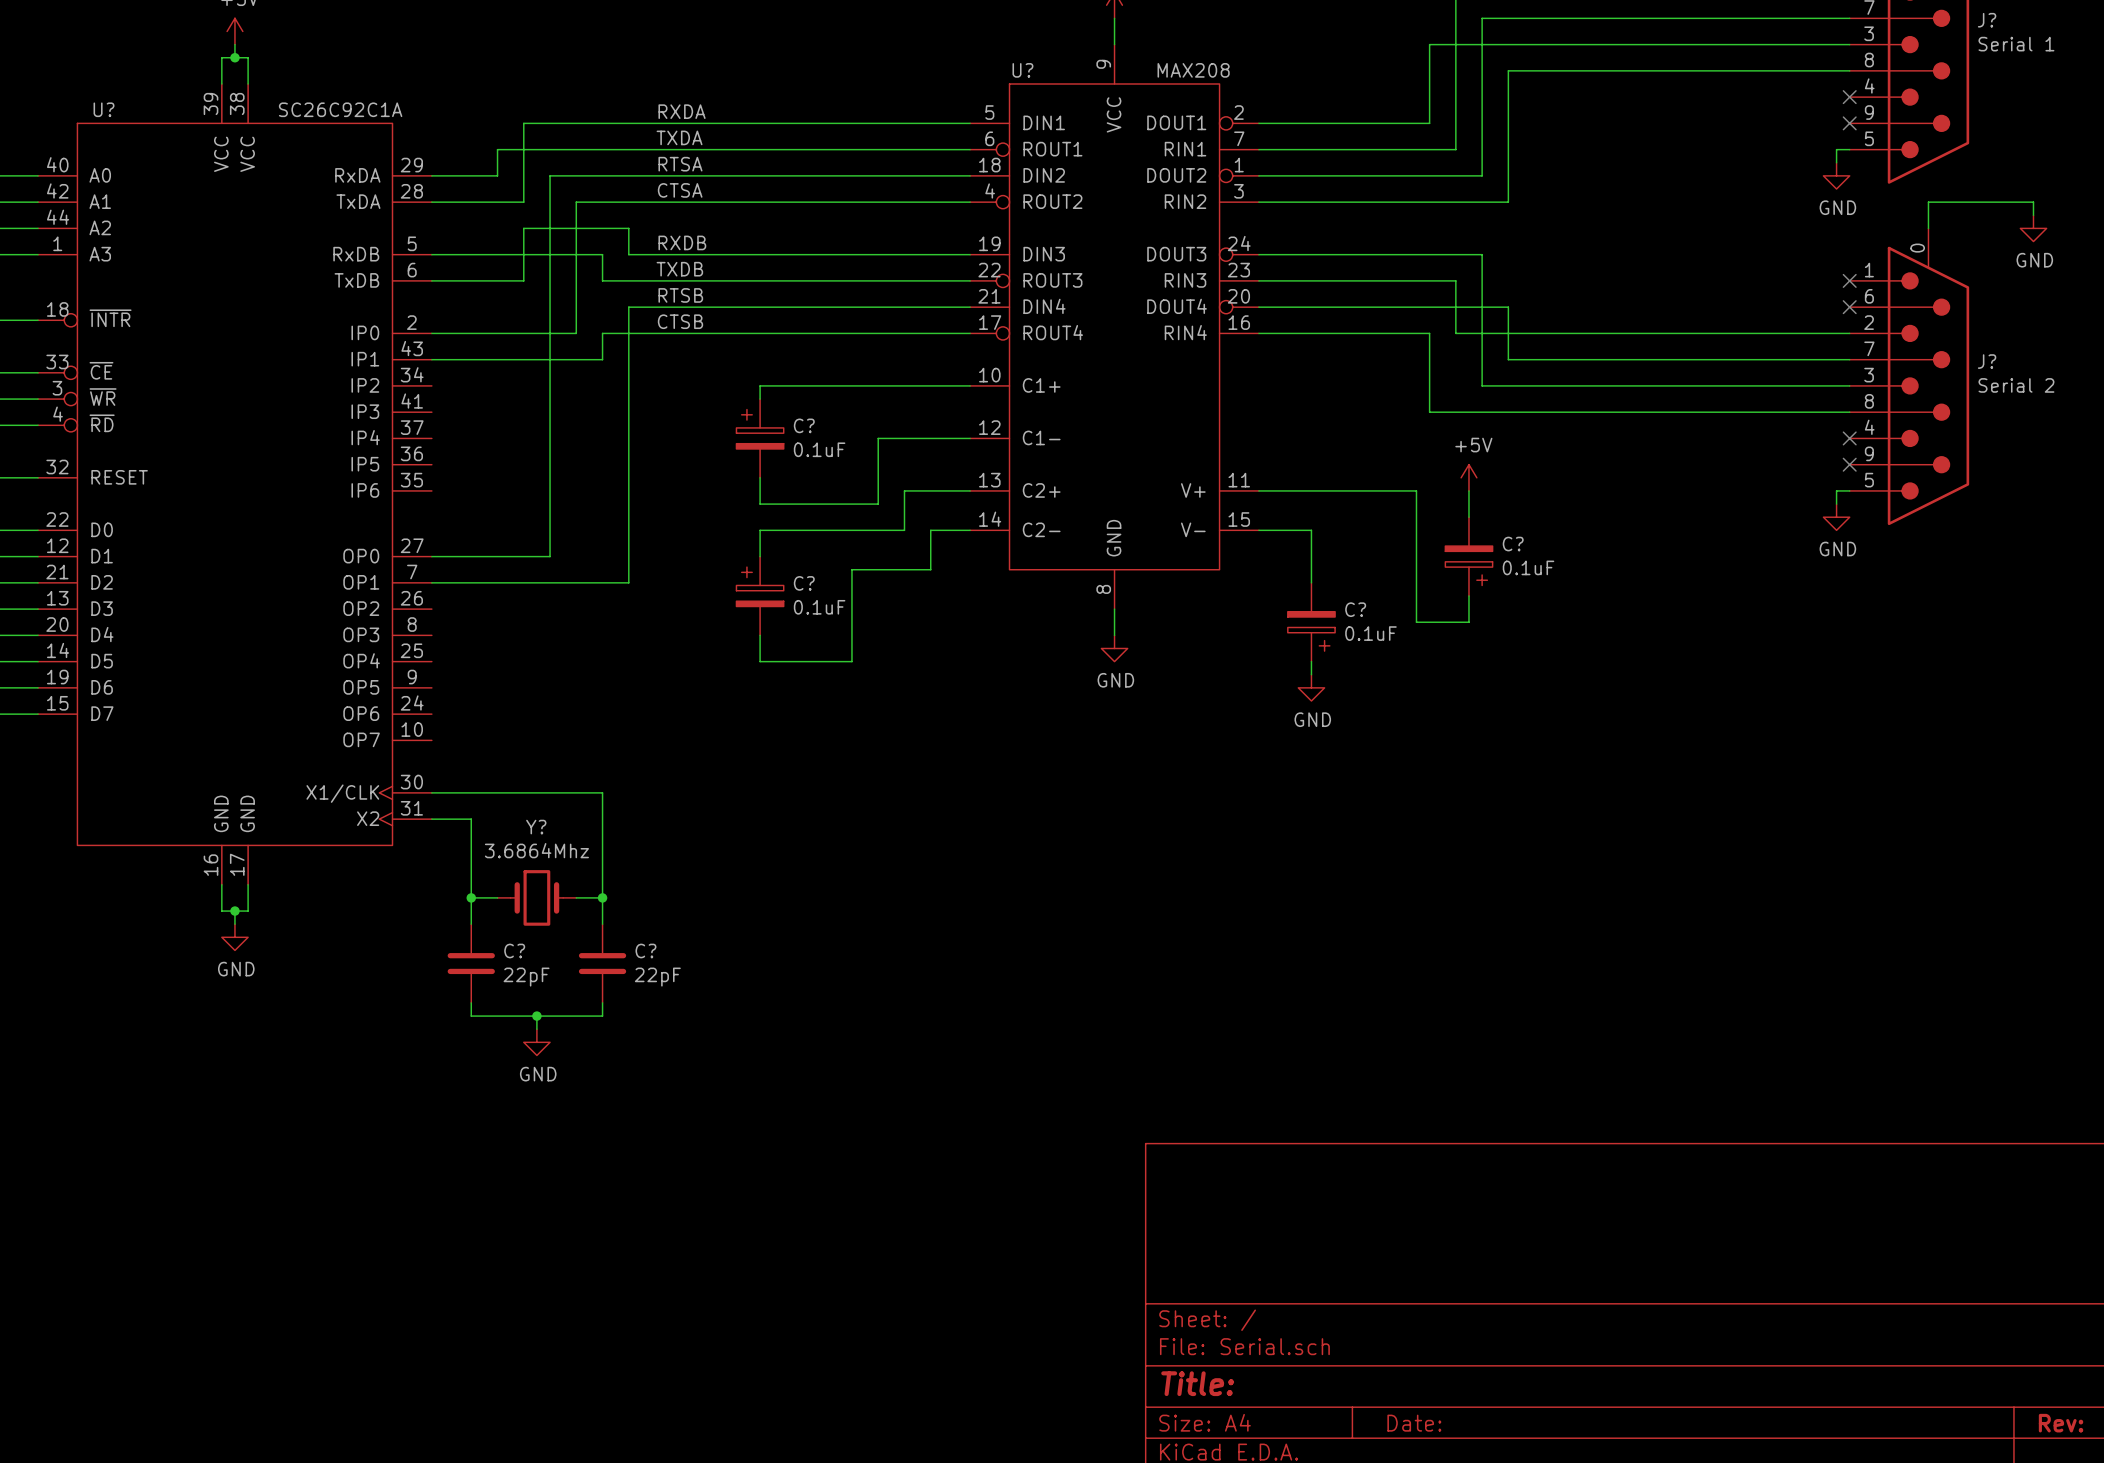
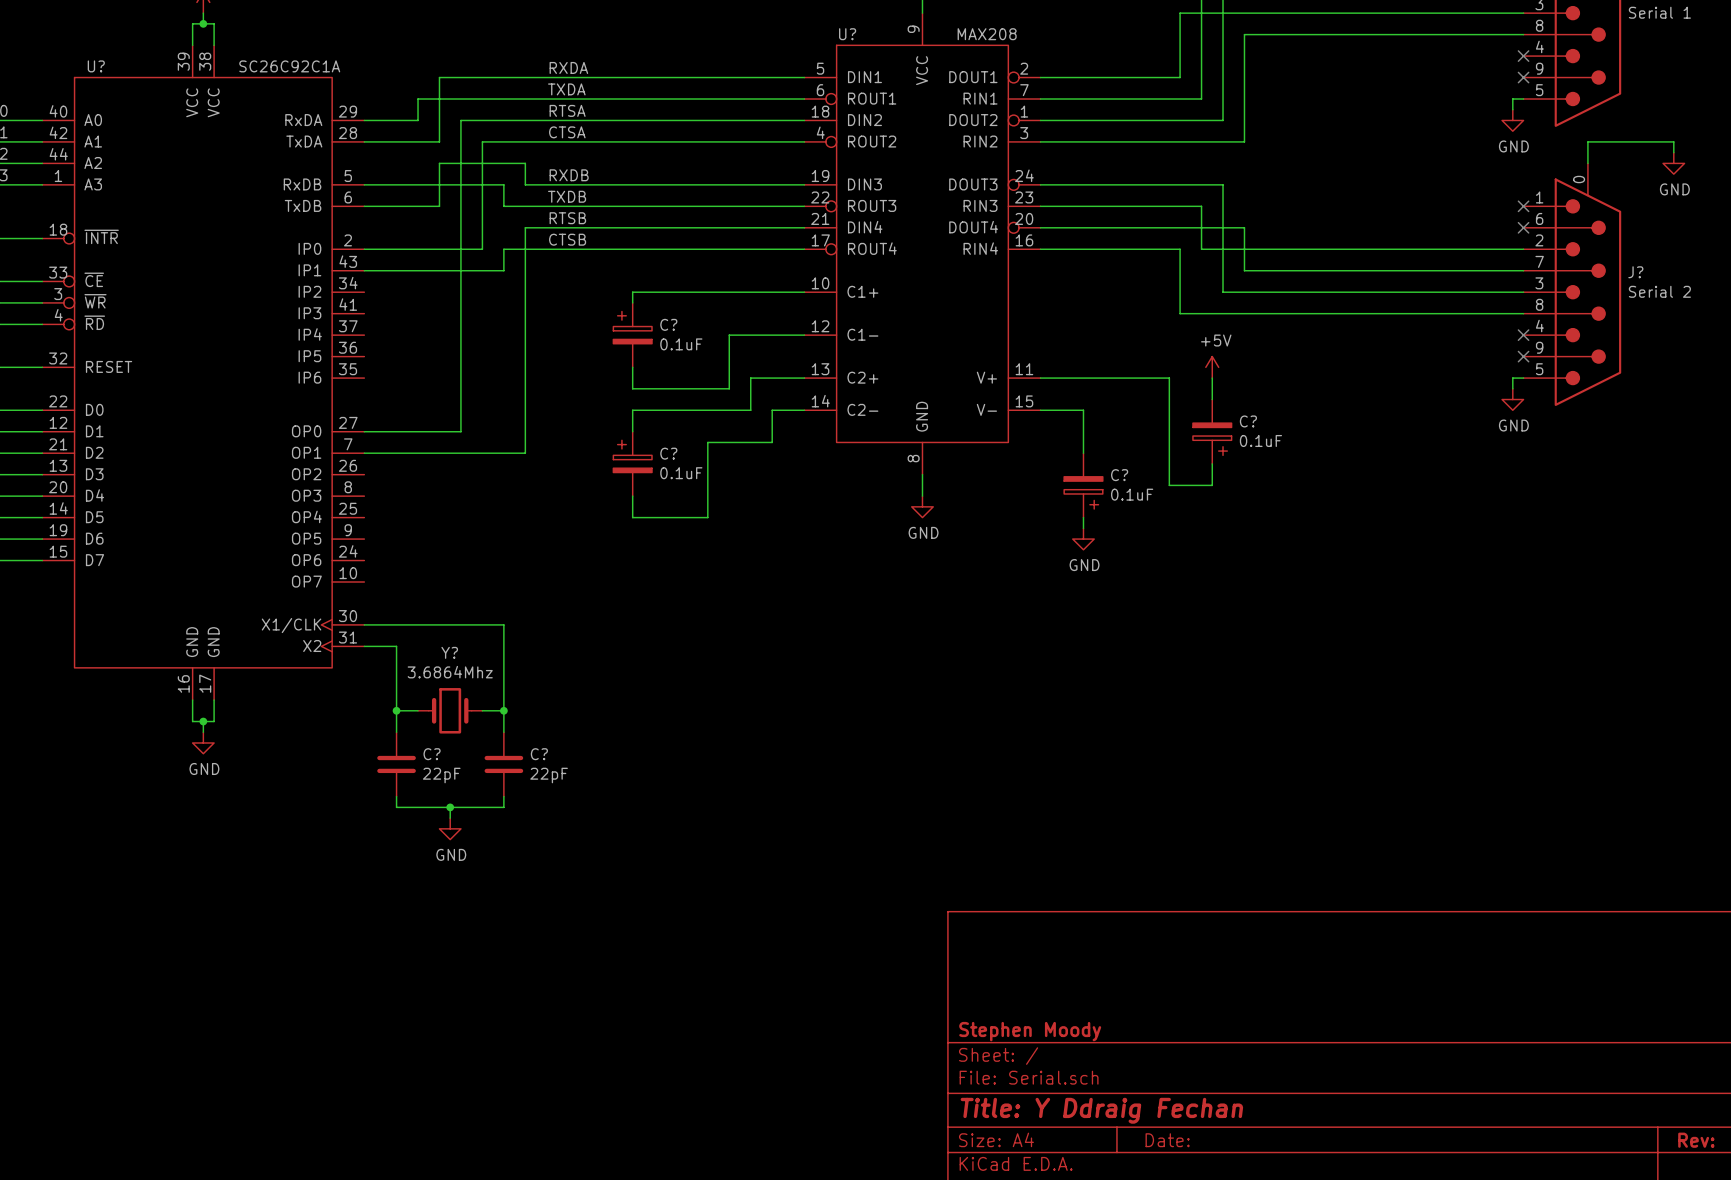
title block: none -> Stephen Moody (1030, 1031)
title block: Title: (1197, 1383) -> Title: Y Ddraig Fechan (1101, 1110)

